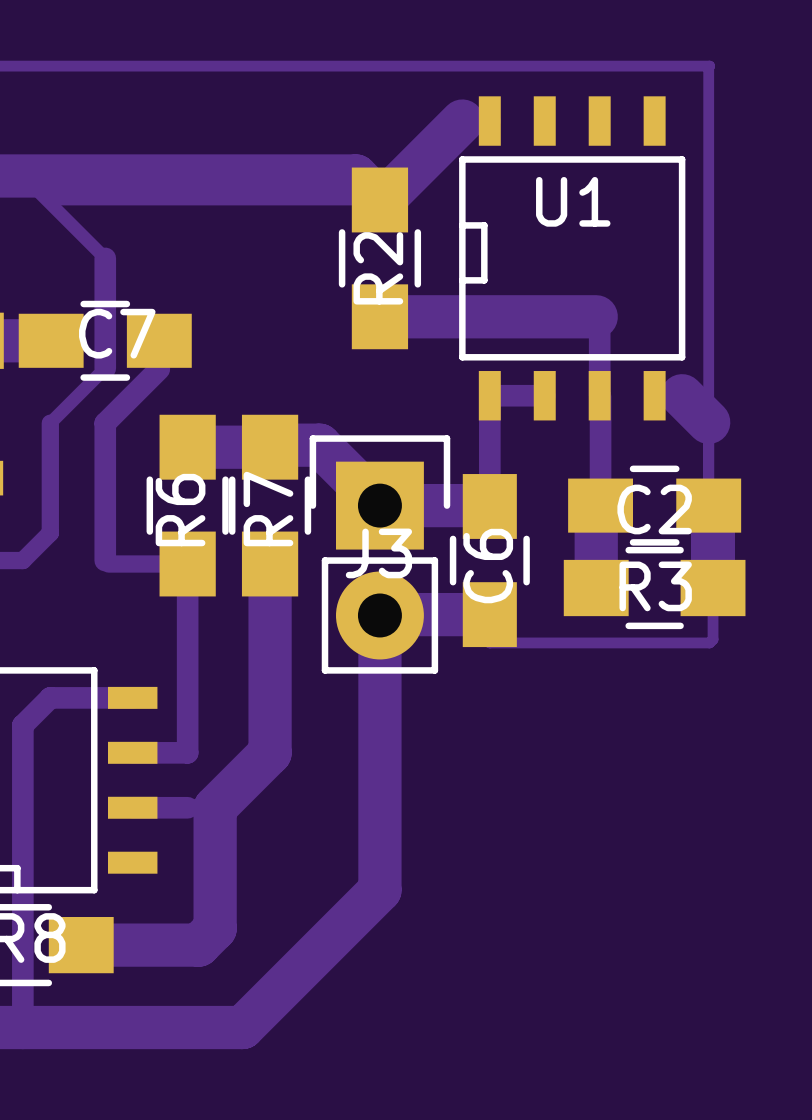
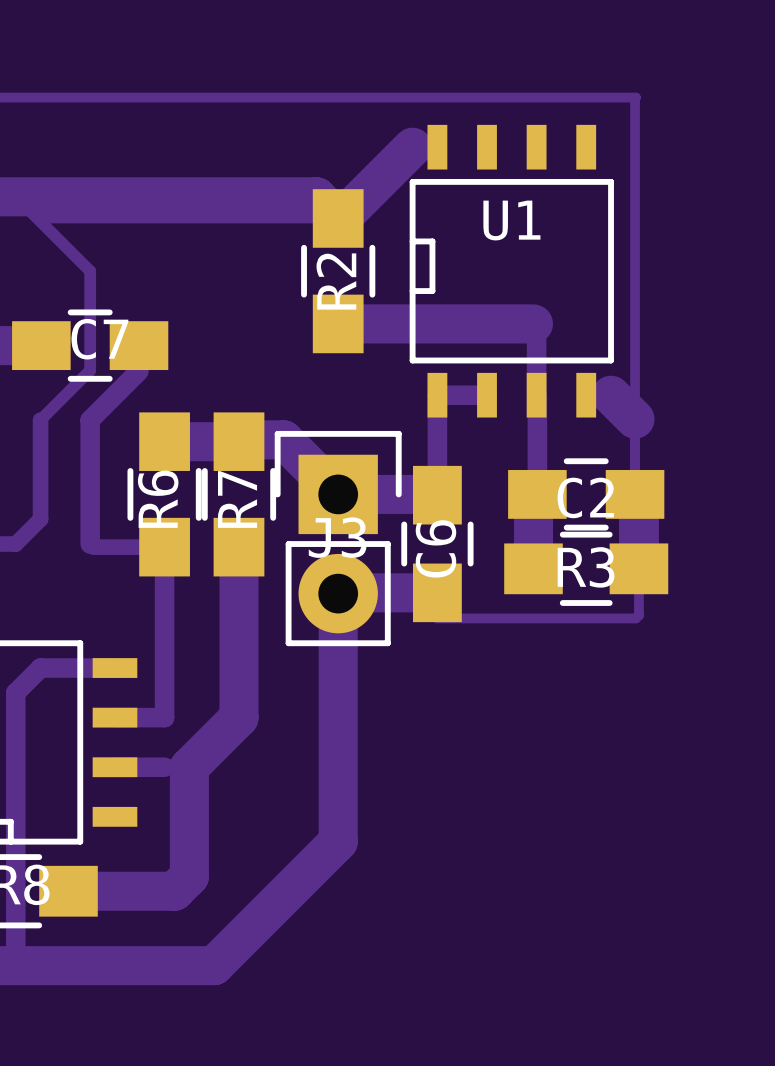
track width: thick (105, 258) (105, 368) -> thin (90, 271) (90, 370)

